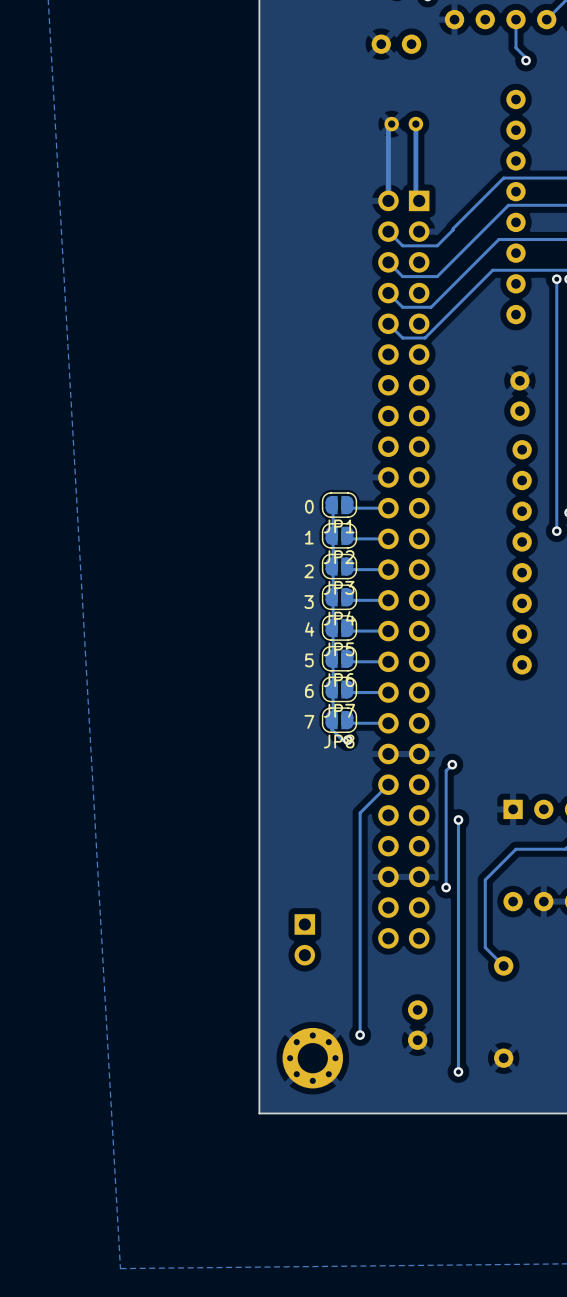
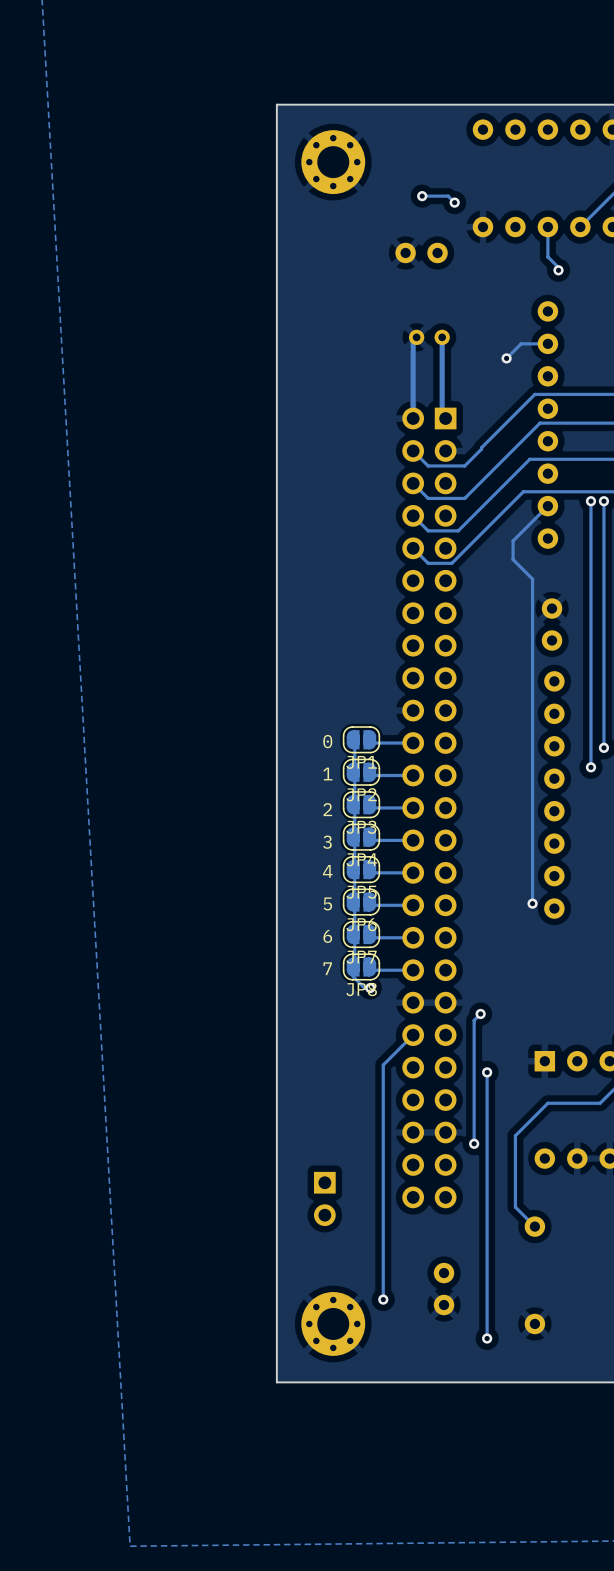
track: none -> (547, 343) (521, 343) (506, 358)
via: none -> (506, 358)
track: none -> (547, 506) (513, 540) (513, 559) (532, 579) (532, 903)
via: none -> (532, 903)

